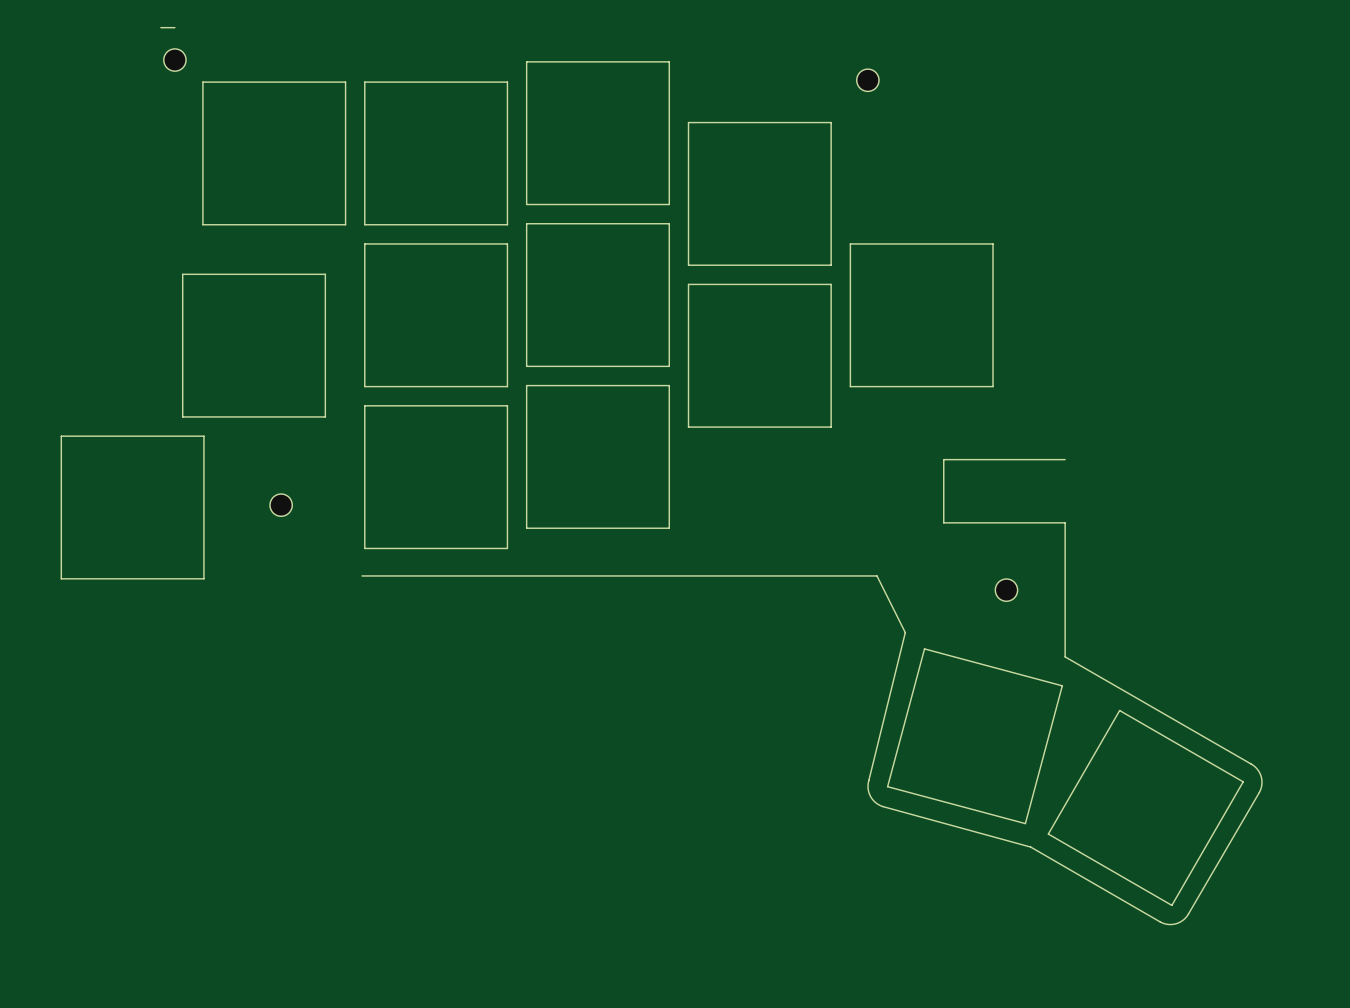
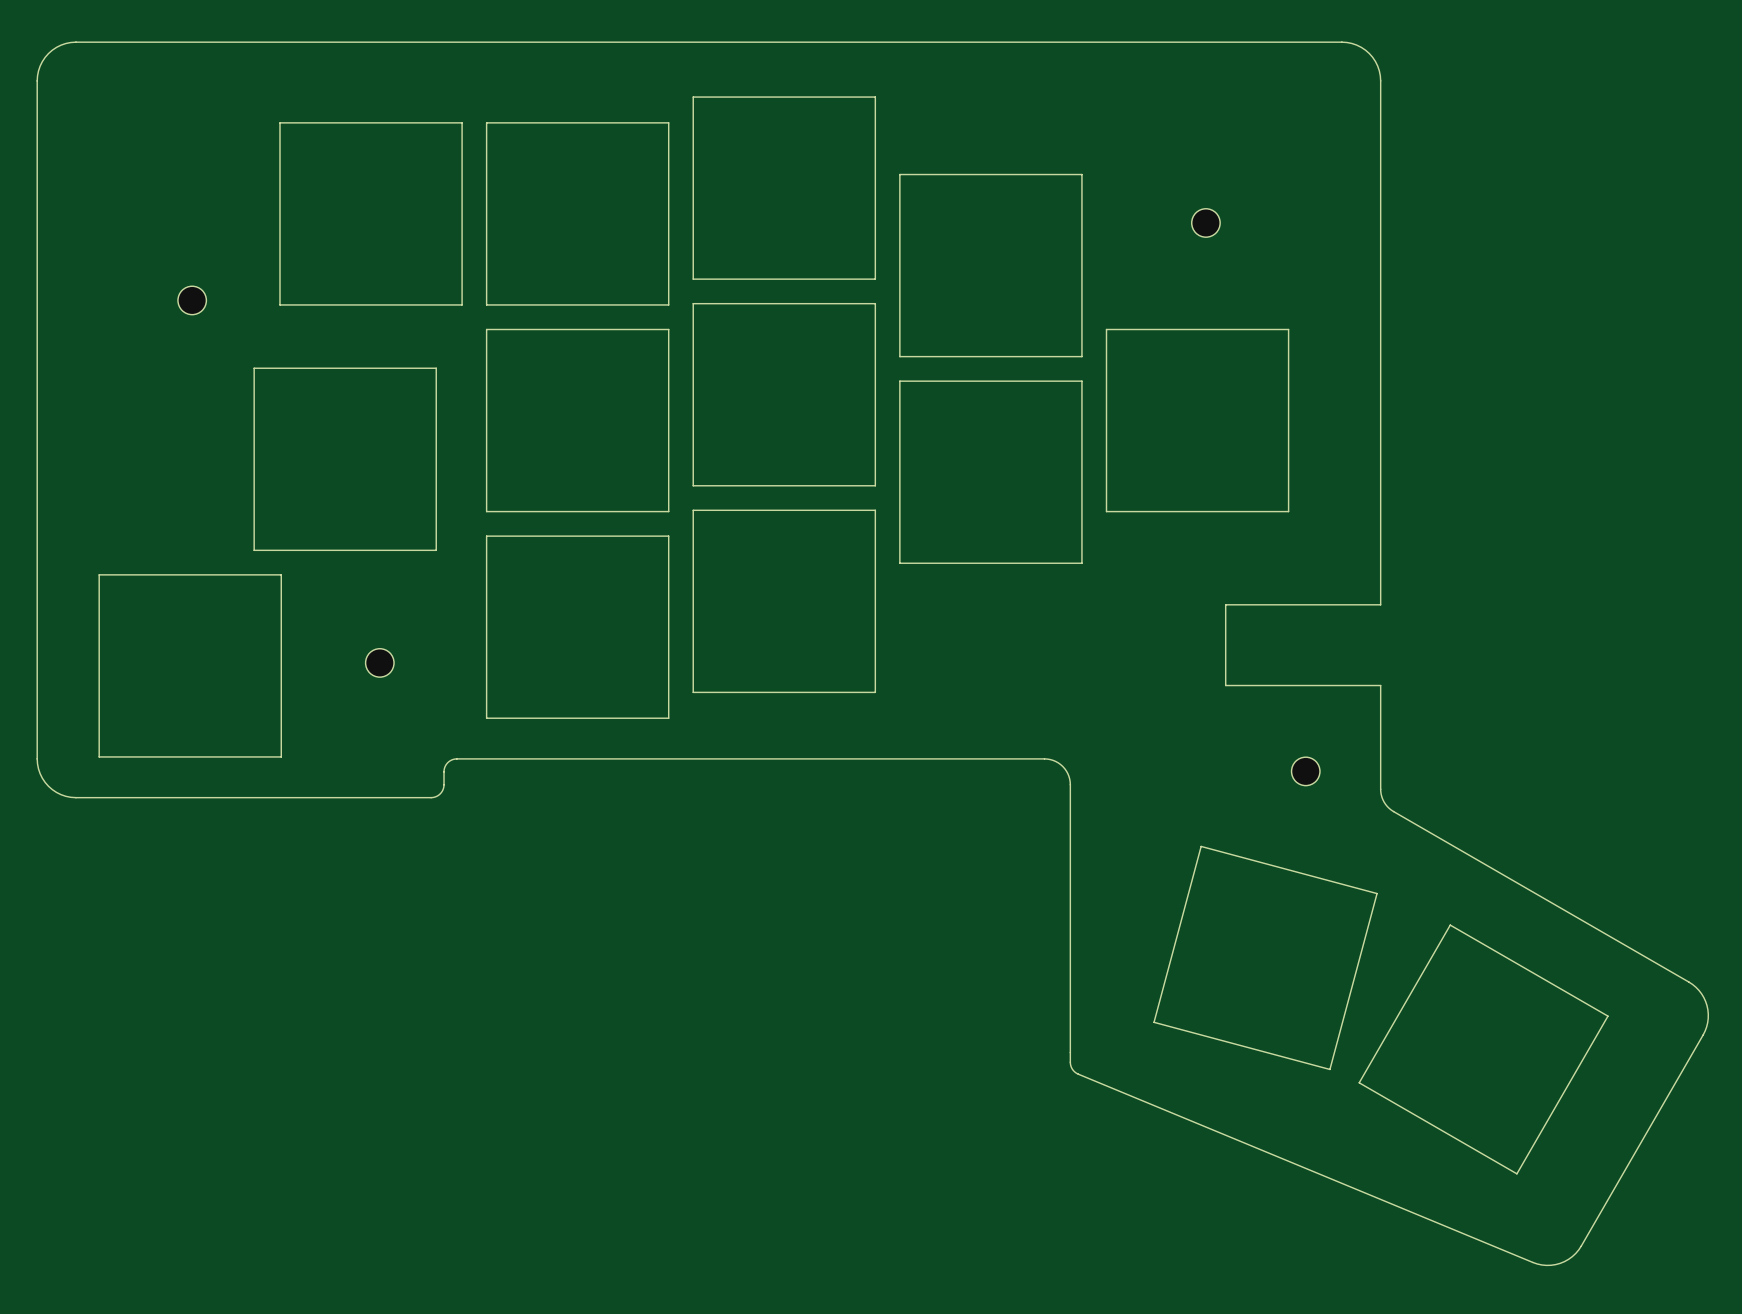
board edge: (174, 27) (160, 27) -> none
part position: (174, 60) -> (192, 300)
part position: (867, 80) -> (1205, 222)
board edge: (362, 575) (876, 575) (905, 632) (868, 783) (868, 791) (873, 800) (883, 806) (1030, 847) (1160, 921) (1169, 924) (1178, 922) (1188, 913) (1259, 792) (1261, 783) (1260, 774) (1251, 764) (1065, 656) (1065, 604) -> (1380, 604) (1380, 80) (1375, 61) (1365, 50) (1356, 45) (1341, 42) (75, 42) (61, 45) (52, 50) (40, 66) (37, 80) (37, 758) (42, 778) (56, 792) (75, 797) (432, 797) (439, 794) (443, 789) (445, 764) (450, 760) (456, 758) (1053, 760) (1064, 768) (1070, 781) (1070, 1062) (1074, 1071) (1532, 1262) (1546, 1265) (1560, 1263) (1572, 1256) (1581, 1246) (1703, 1035) (1708, 1018) (1705, 1001) (1698, 990) (1688, 982) (1391, 810) (1382, 799) (1380, 789)

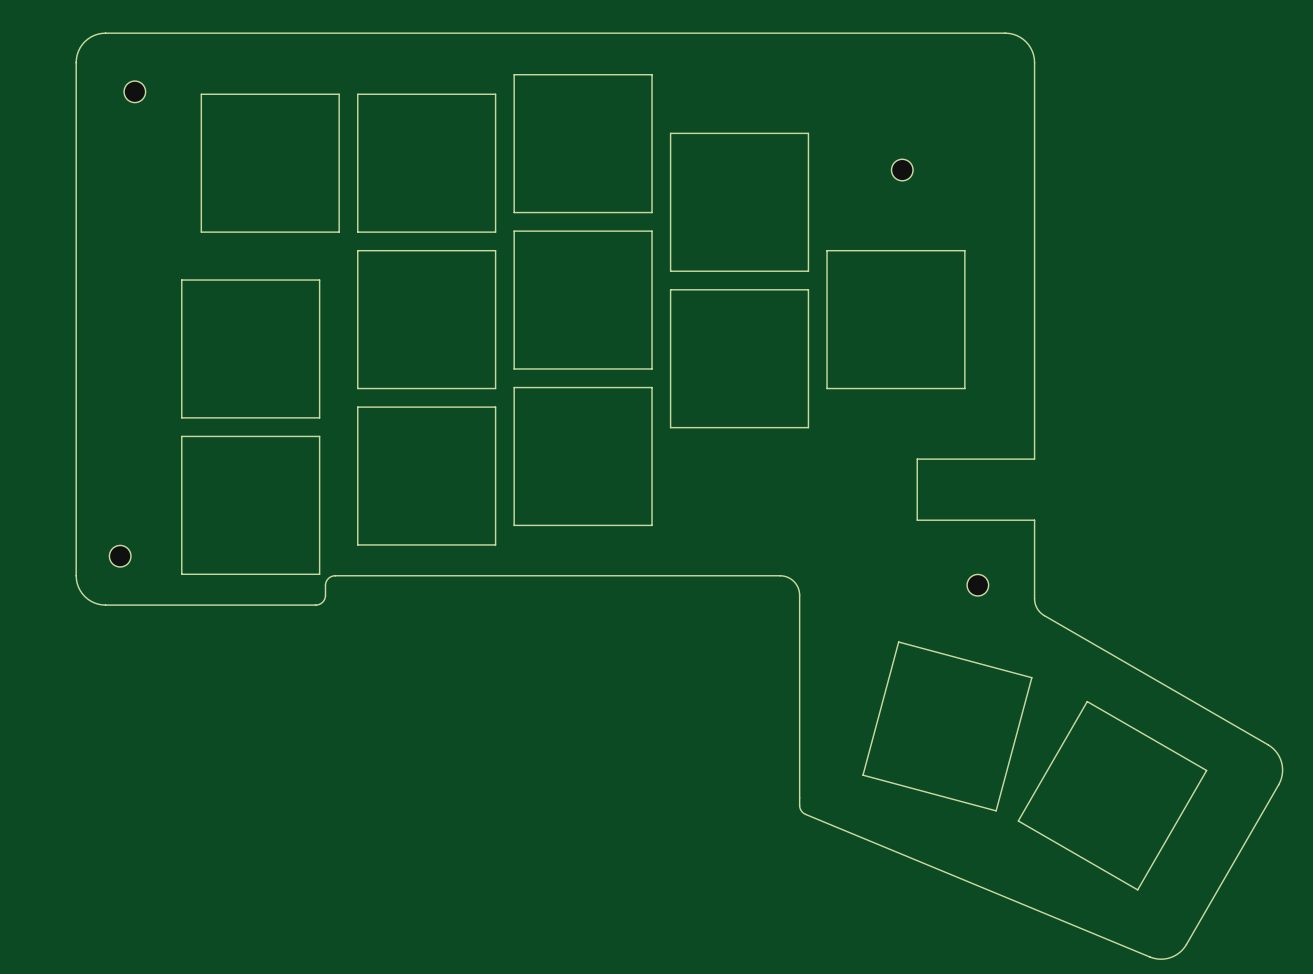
board edge: (153, 42) (65, 43) (52, 50) (45, 57) (40, 66) (37, 80) (37, 763) (42, 778) (48, 786) (65, 796) (153, 797) -> (105, 33) (94, 35) (84, 41) (78, 51) (76, 62) (76, 575) (78, 586) (84, 596) (94, 602) (105, 605)
part position: (192, 300) -> (134, 91)
part: (379, 662) -> none
drawing position: (190, 665) -> (250, 505)
part: none -> (120, 556)

